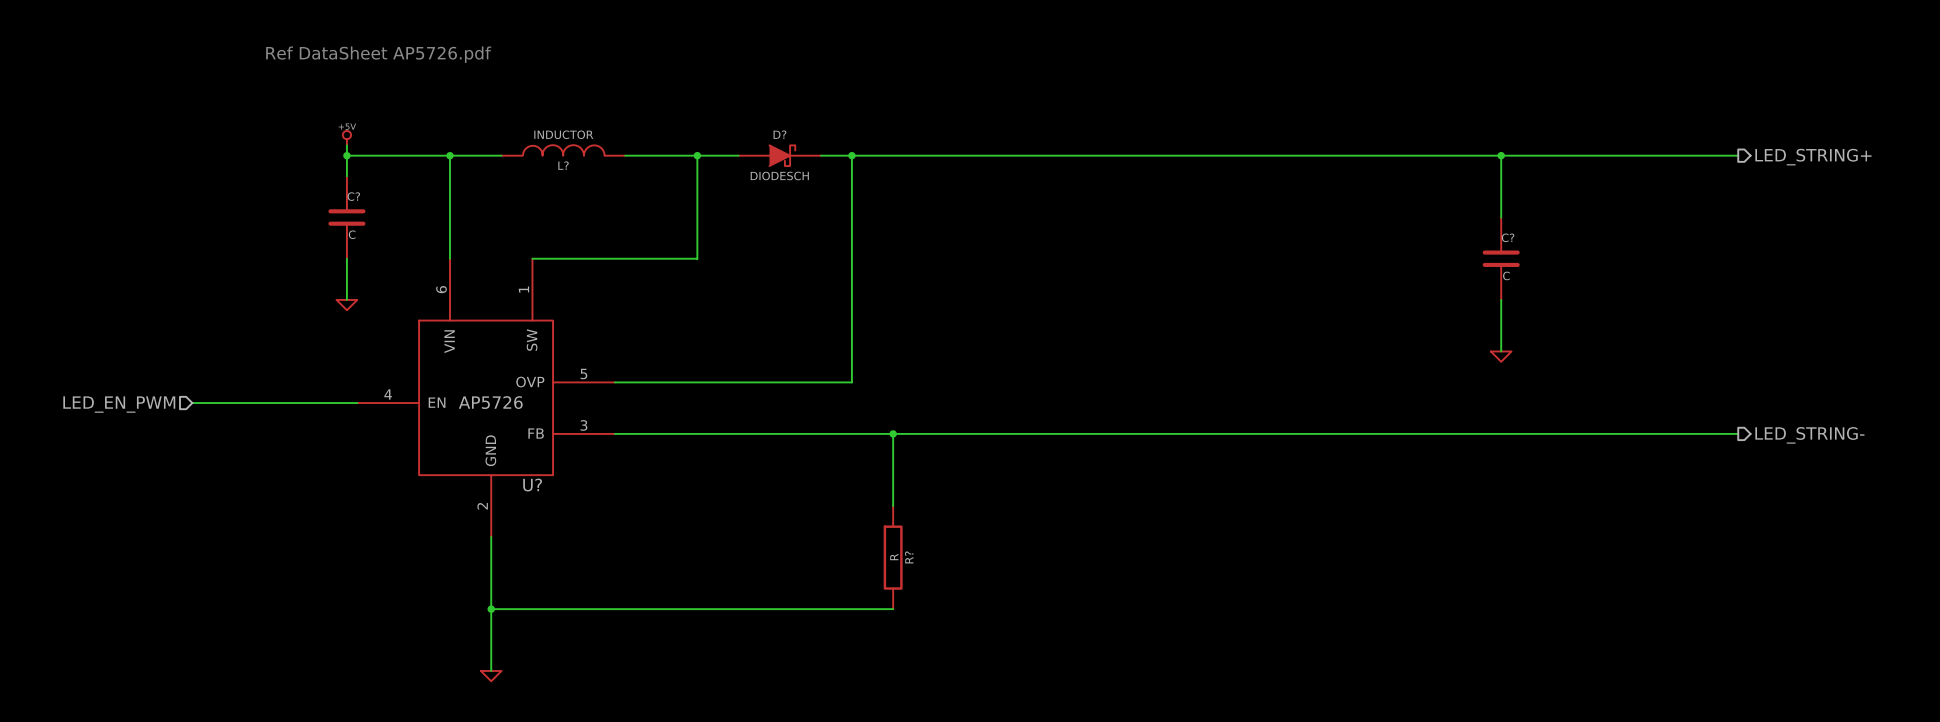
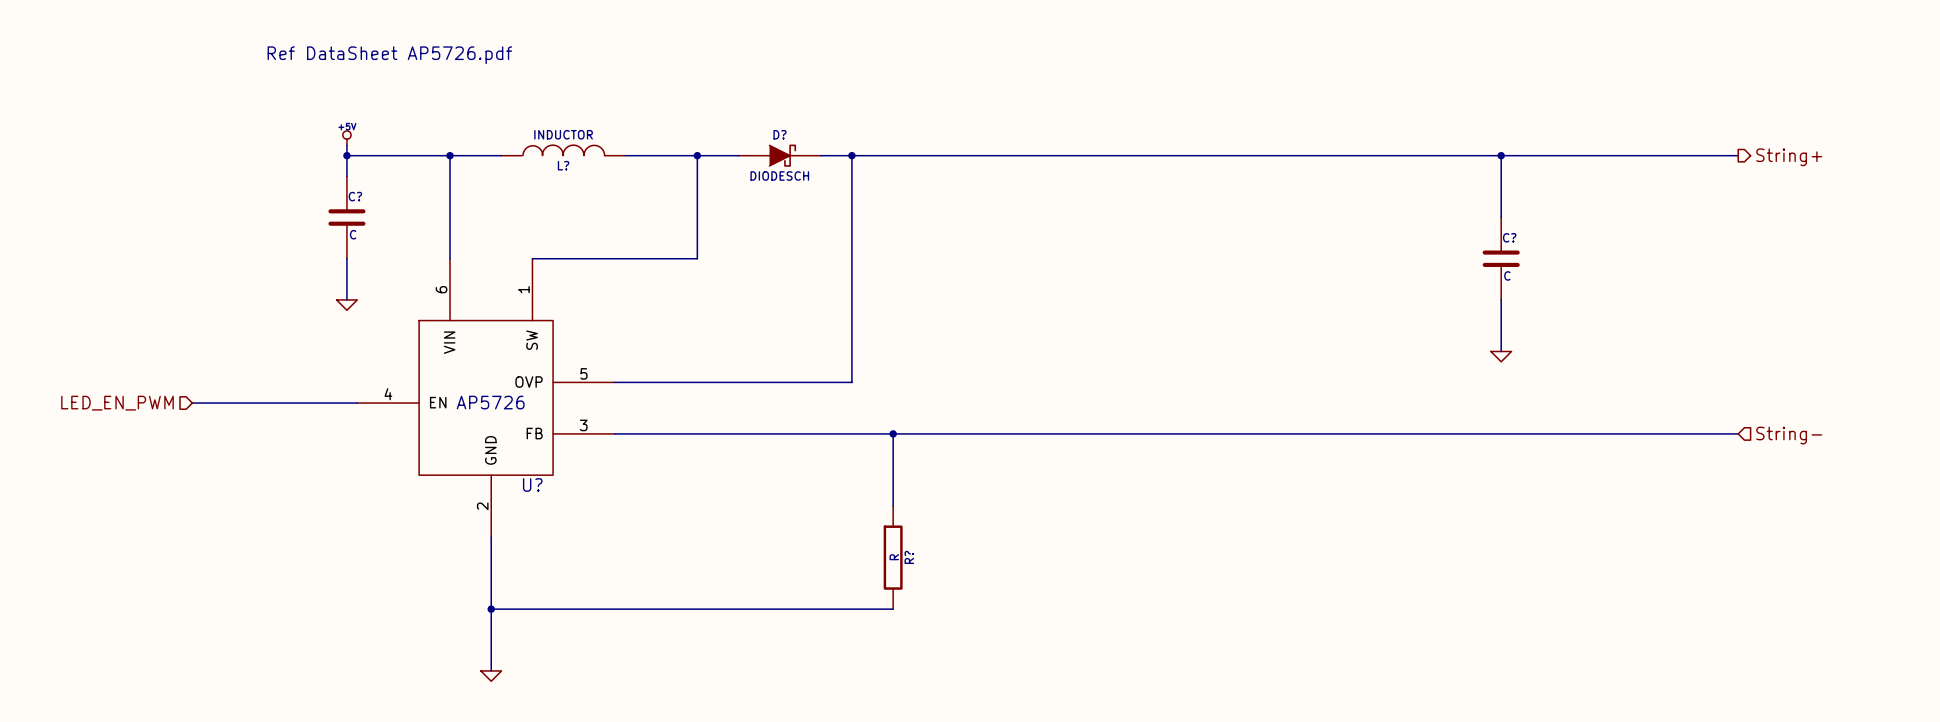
hierarchical label: LED_STRING+ (1813, 157) -> String+ (1789, 157)
hierarchical label shape: output (1809, 435) -> input (1789, 435)
hierarchical label: LED_STRING- (1809, 435) -> String- (1789, 435)

